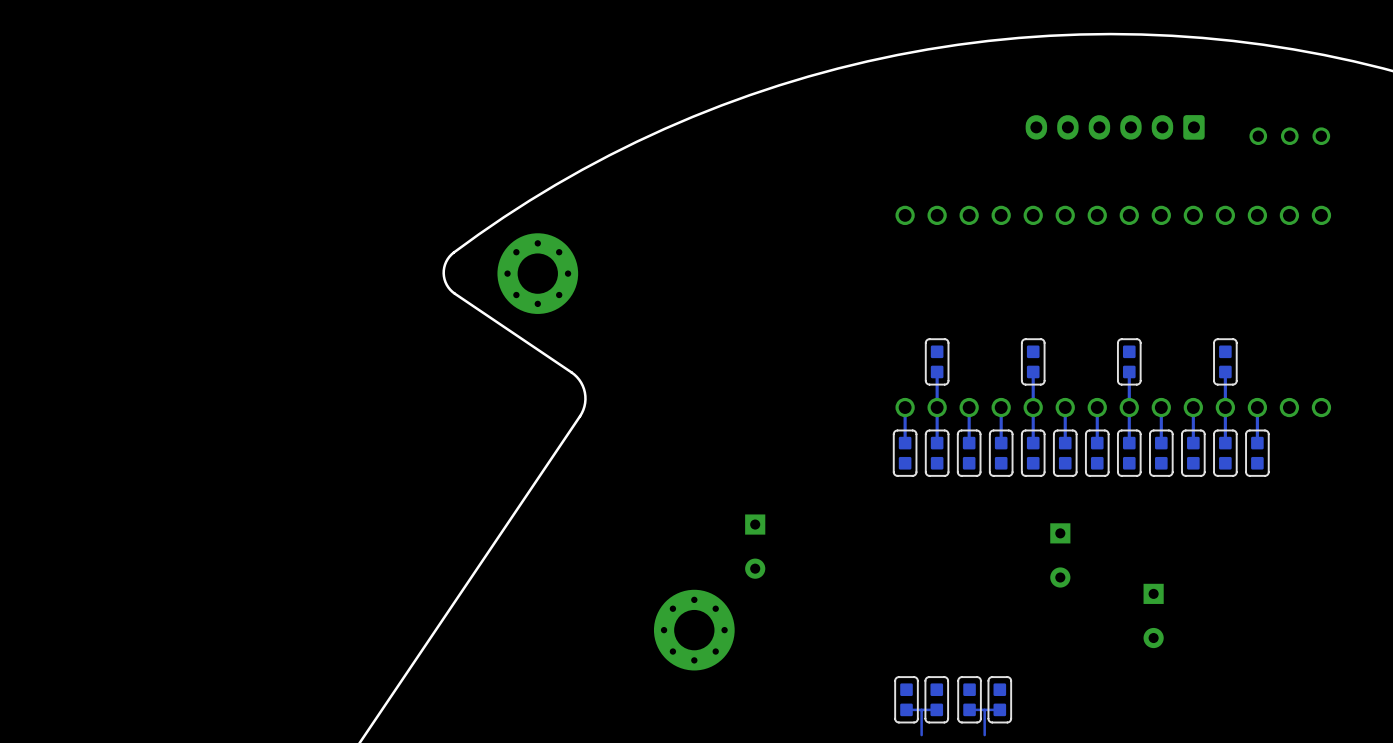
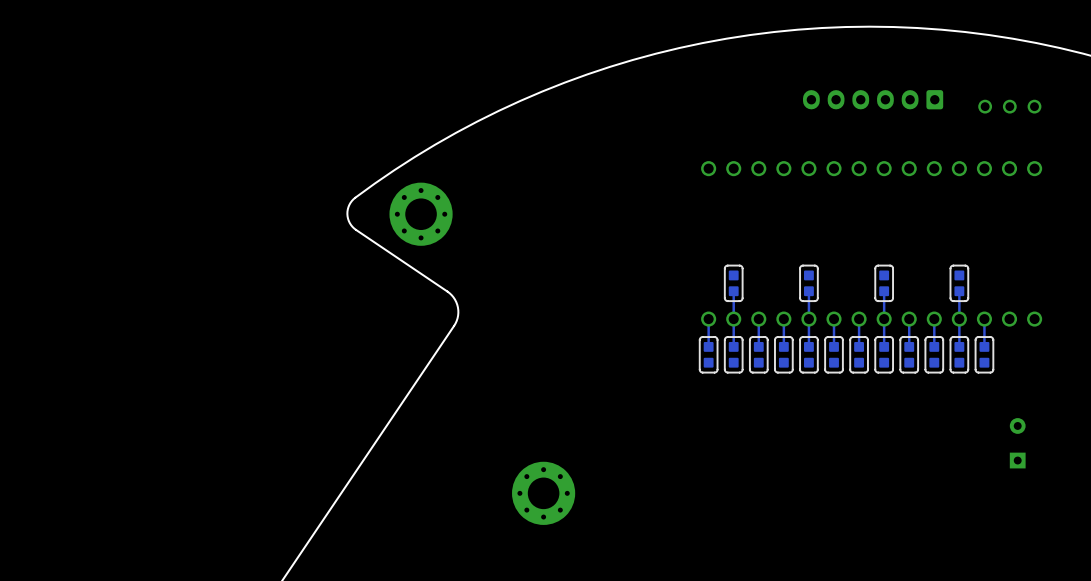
part: (755, 546) -> none
part: (1060, 555) -> none
part: none -> (1017, 443)
part: (1153, 615) -> none
part: (906, 699) -> none
part: (936, 699) -> none
part: (969, 699) -> none
part: (999, 699) -> none
track: (921, 709) (921, 735) -> none
track: (936, 709) (906, 709) -> none
track: (984, 709) (984, 735) -> none
track: (999, 709) (969, 709) -> none

